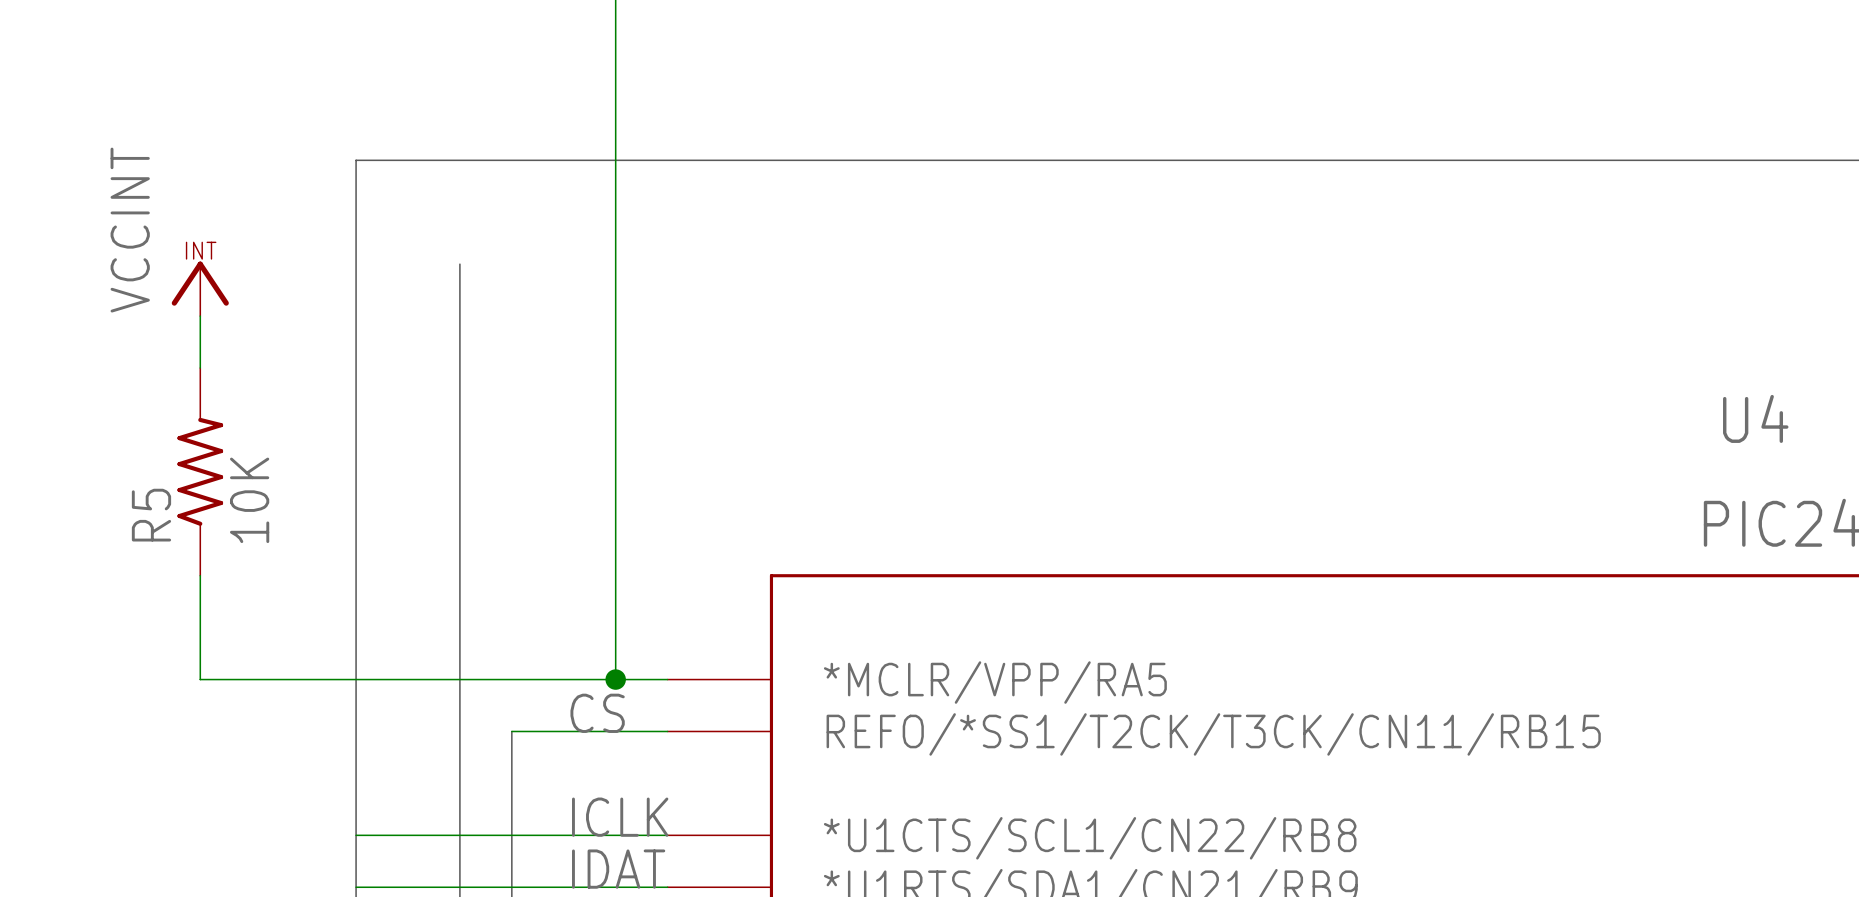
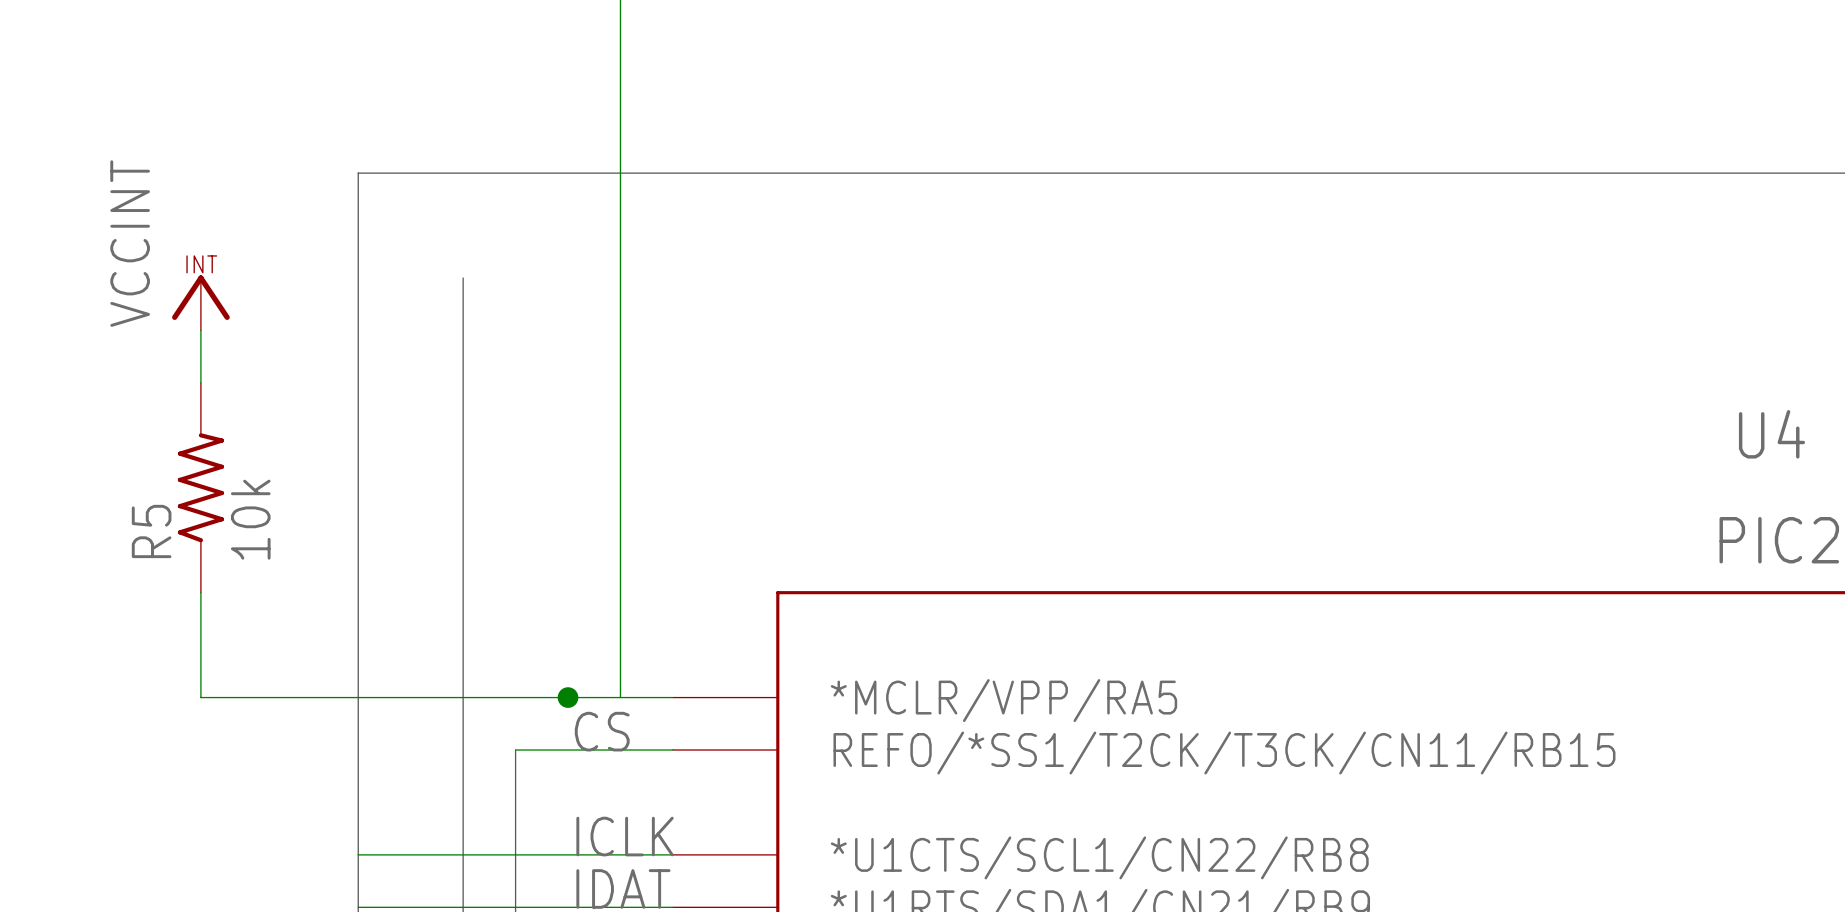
R5 value: 10K (249, 500) -> 10k (250, 519)
junction position: (615, 679) -> (568, 697)

